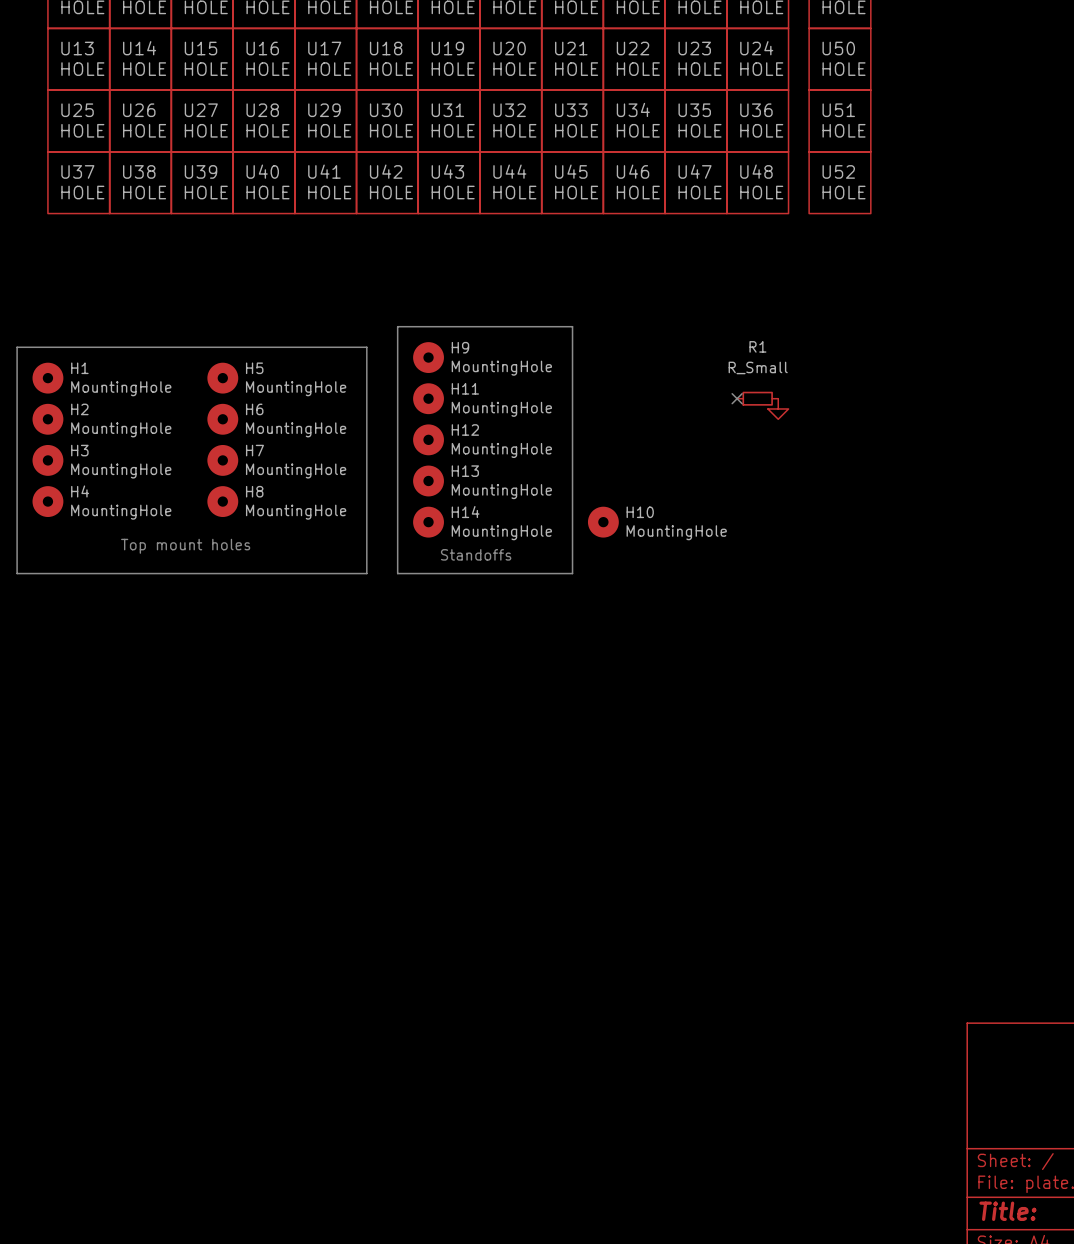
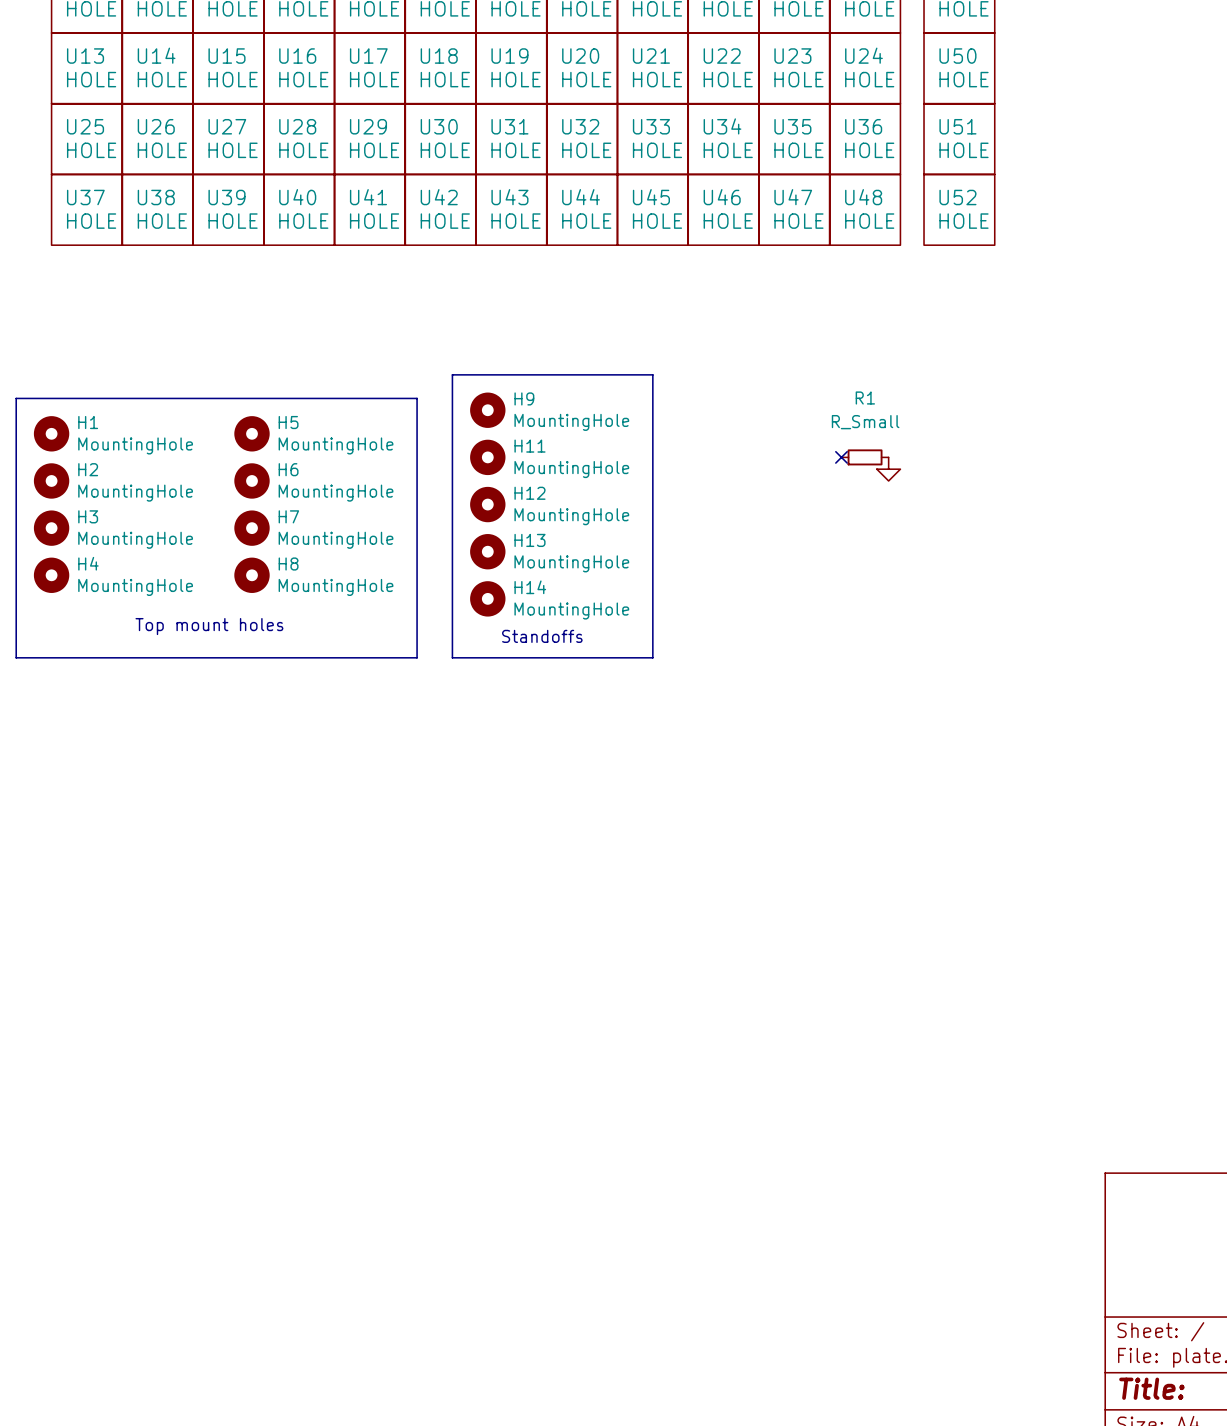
H10: MountingHole (603, 522) -> none

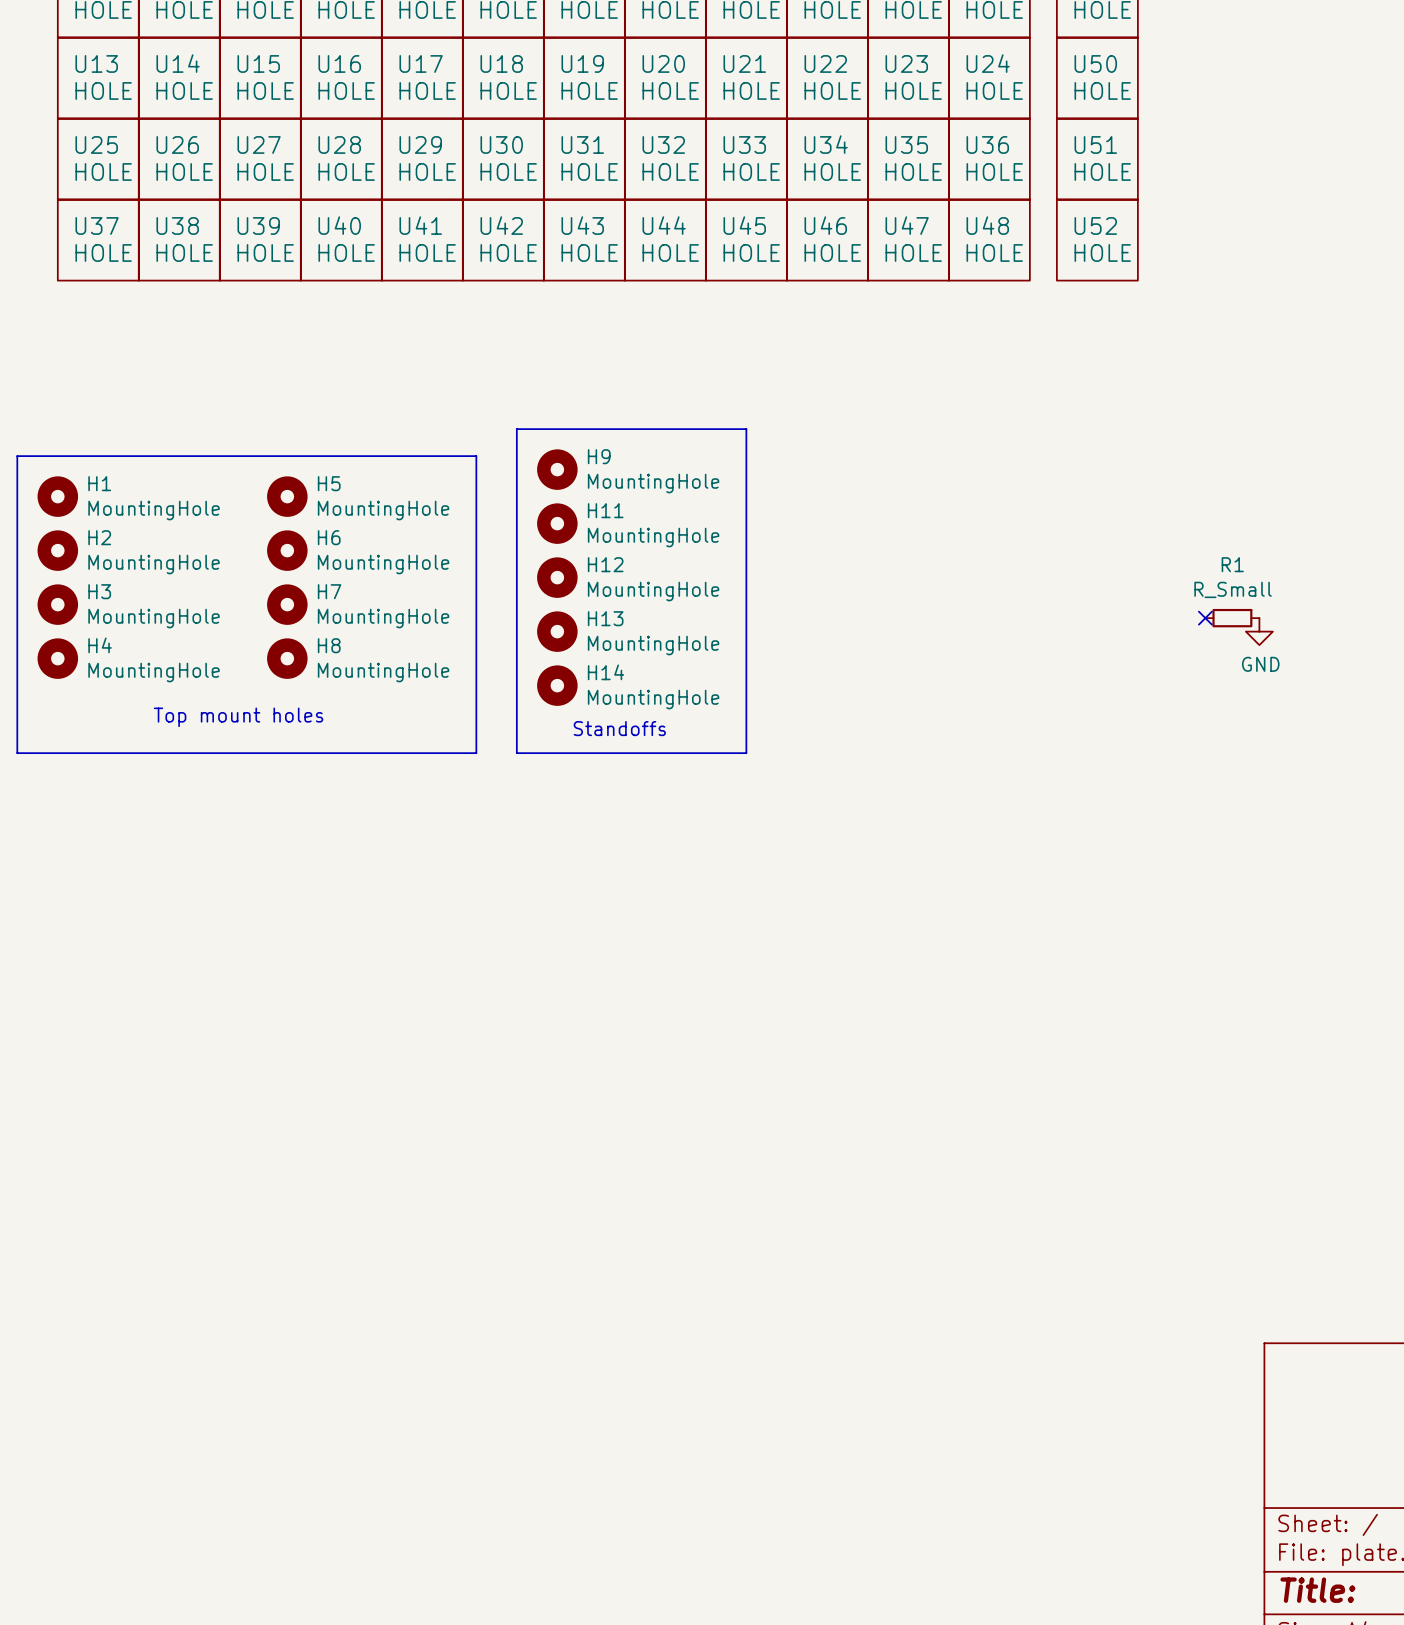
R1 name position: R1 (865, 398) -> R1 (1232, 564)
R1 value position: R_Small (865, 422) -> R_Small (1233, 589)
no-connect mark: (841, 457) -> none
R1 position: (865, 457) -> (1232, 618)
power symbol: (888, 469) -> none
no-connect mark: none -> (1205, 618)
power symbol: none -> GND (1259, 631)

